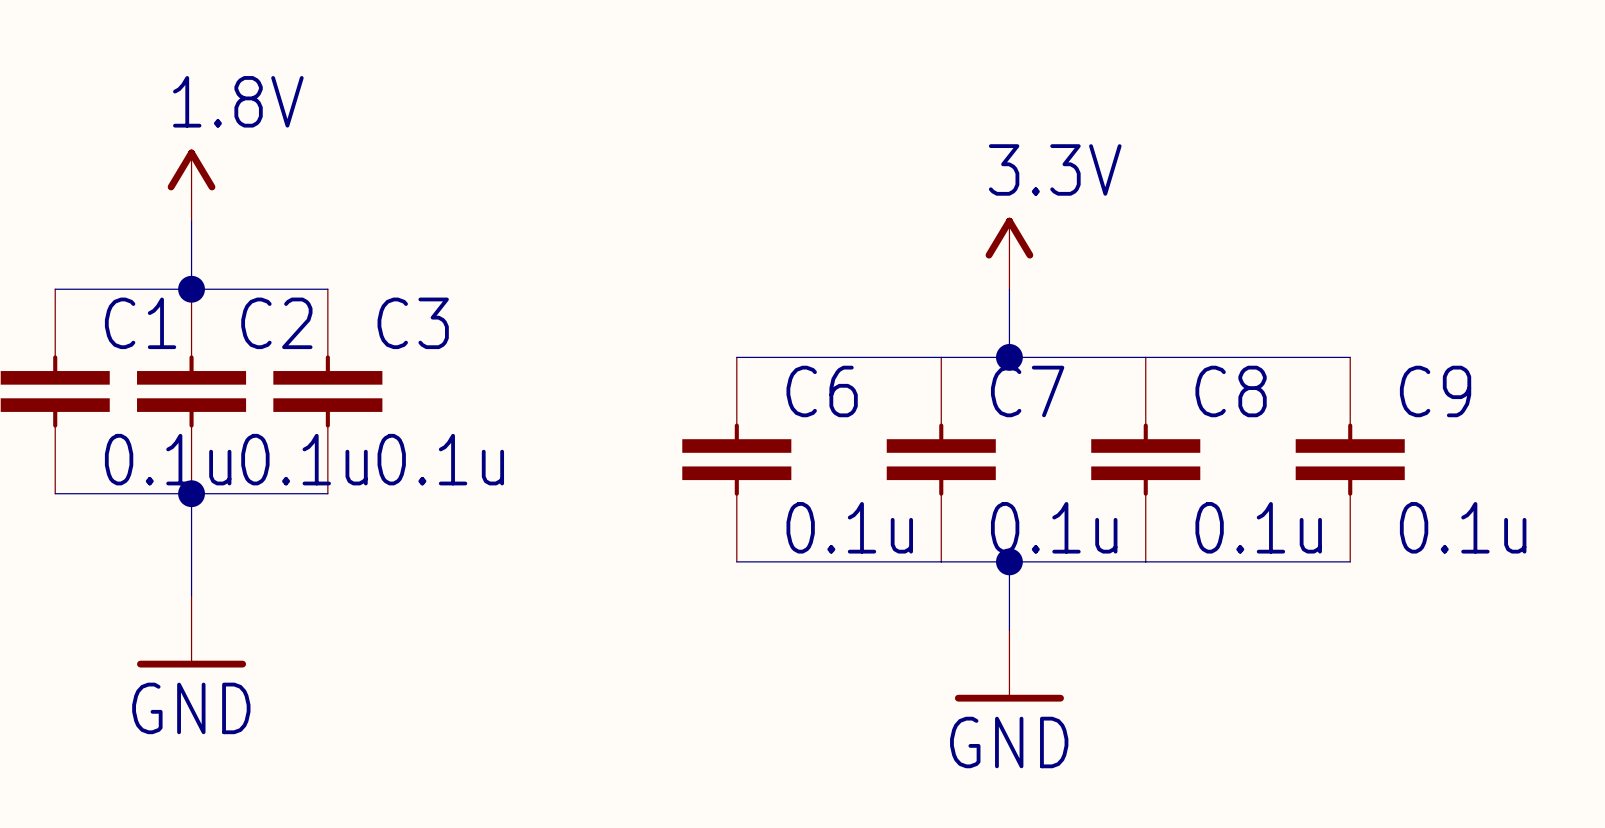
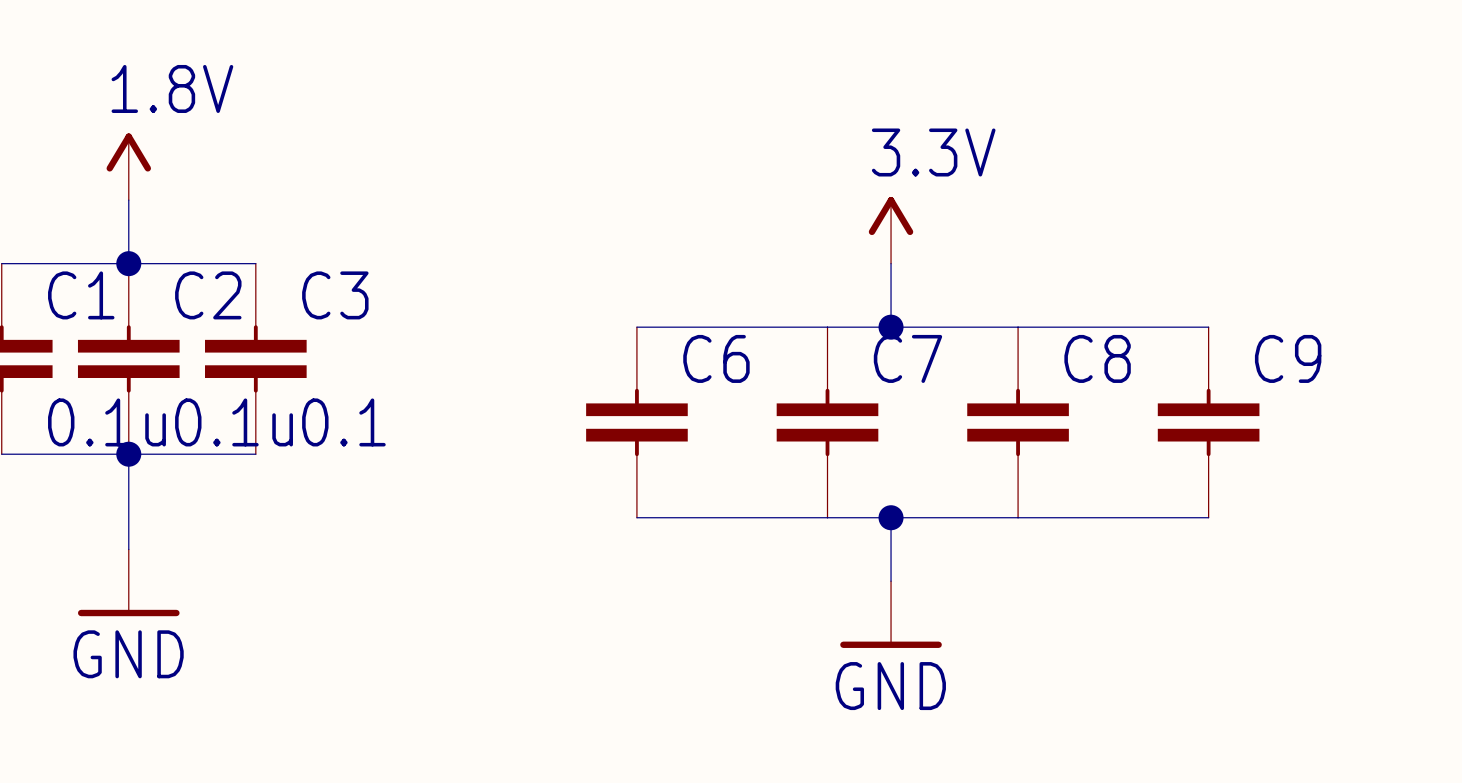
C3 value: 0.1u (440, 459) -> 0.1 (343, 422)
C6 value: 0.1u (849, 527) -> none
C7 value: 0.1u (1054, 527) -> none
C8 value: 0.1u (1258, 527) -> none
C9 value: 0.1u (1463, 527) -> none

